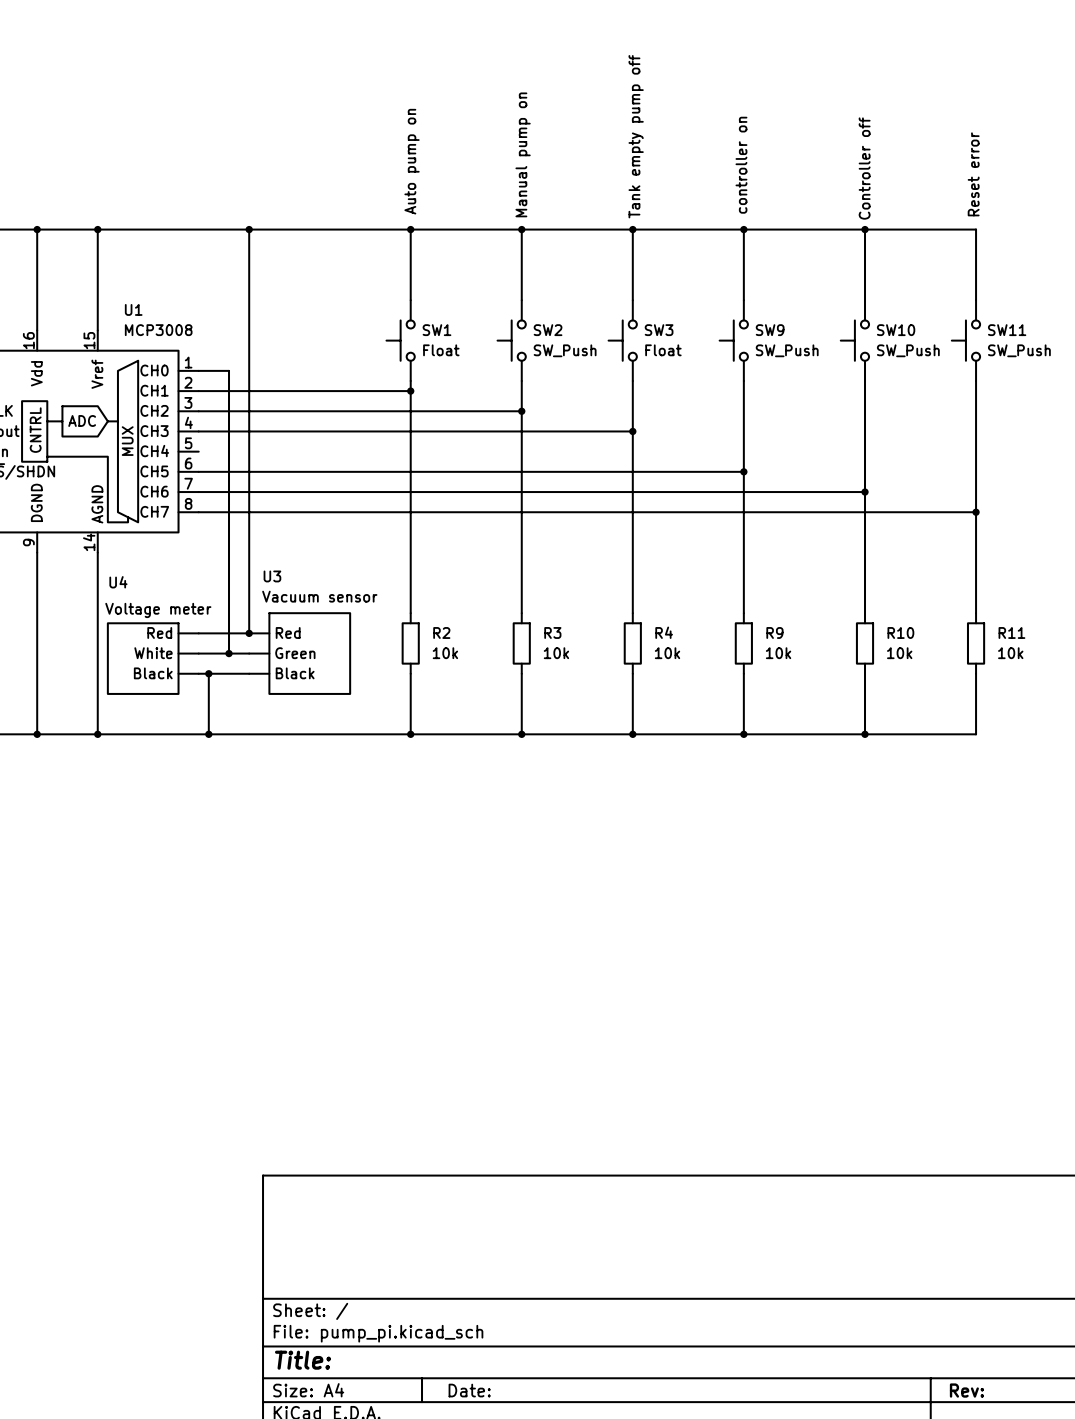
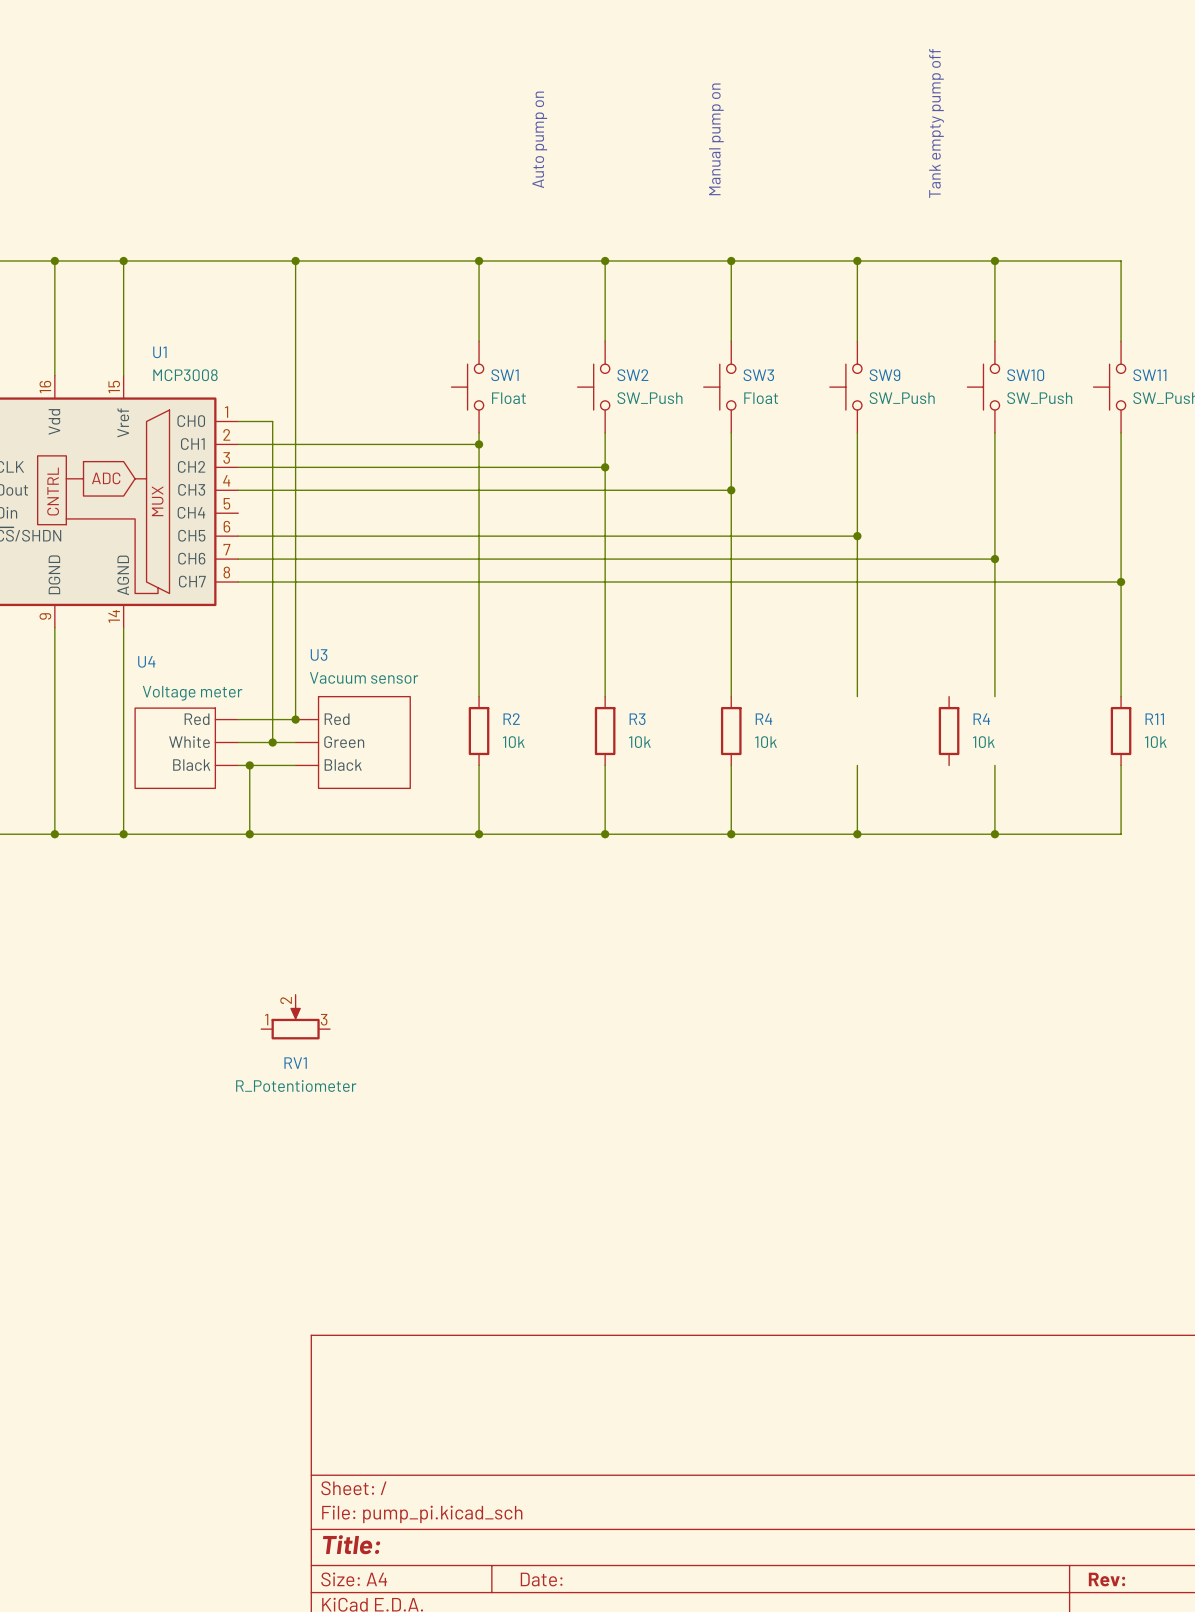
text position: Tank empty pump off (636, 136) -> Tank empty pump off (936, 123)
text position: Manual pump on (523, 154) -> Manual pump on (716, 139)
text position: Auto pump on (412, 161) -> Auto pump on (539, 139)
text: controller on (741, 165) -> none
text: Controller off (864, 168) -> none
text: Reset error (973, 174) -> none
R9: 10k (743, 643) -> none
R4: none -> 10k (949, 731)
R10: 10k (865, 643) -> none
RV1: none -> R_Potentiometer (295, 1017)

